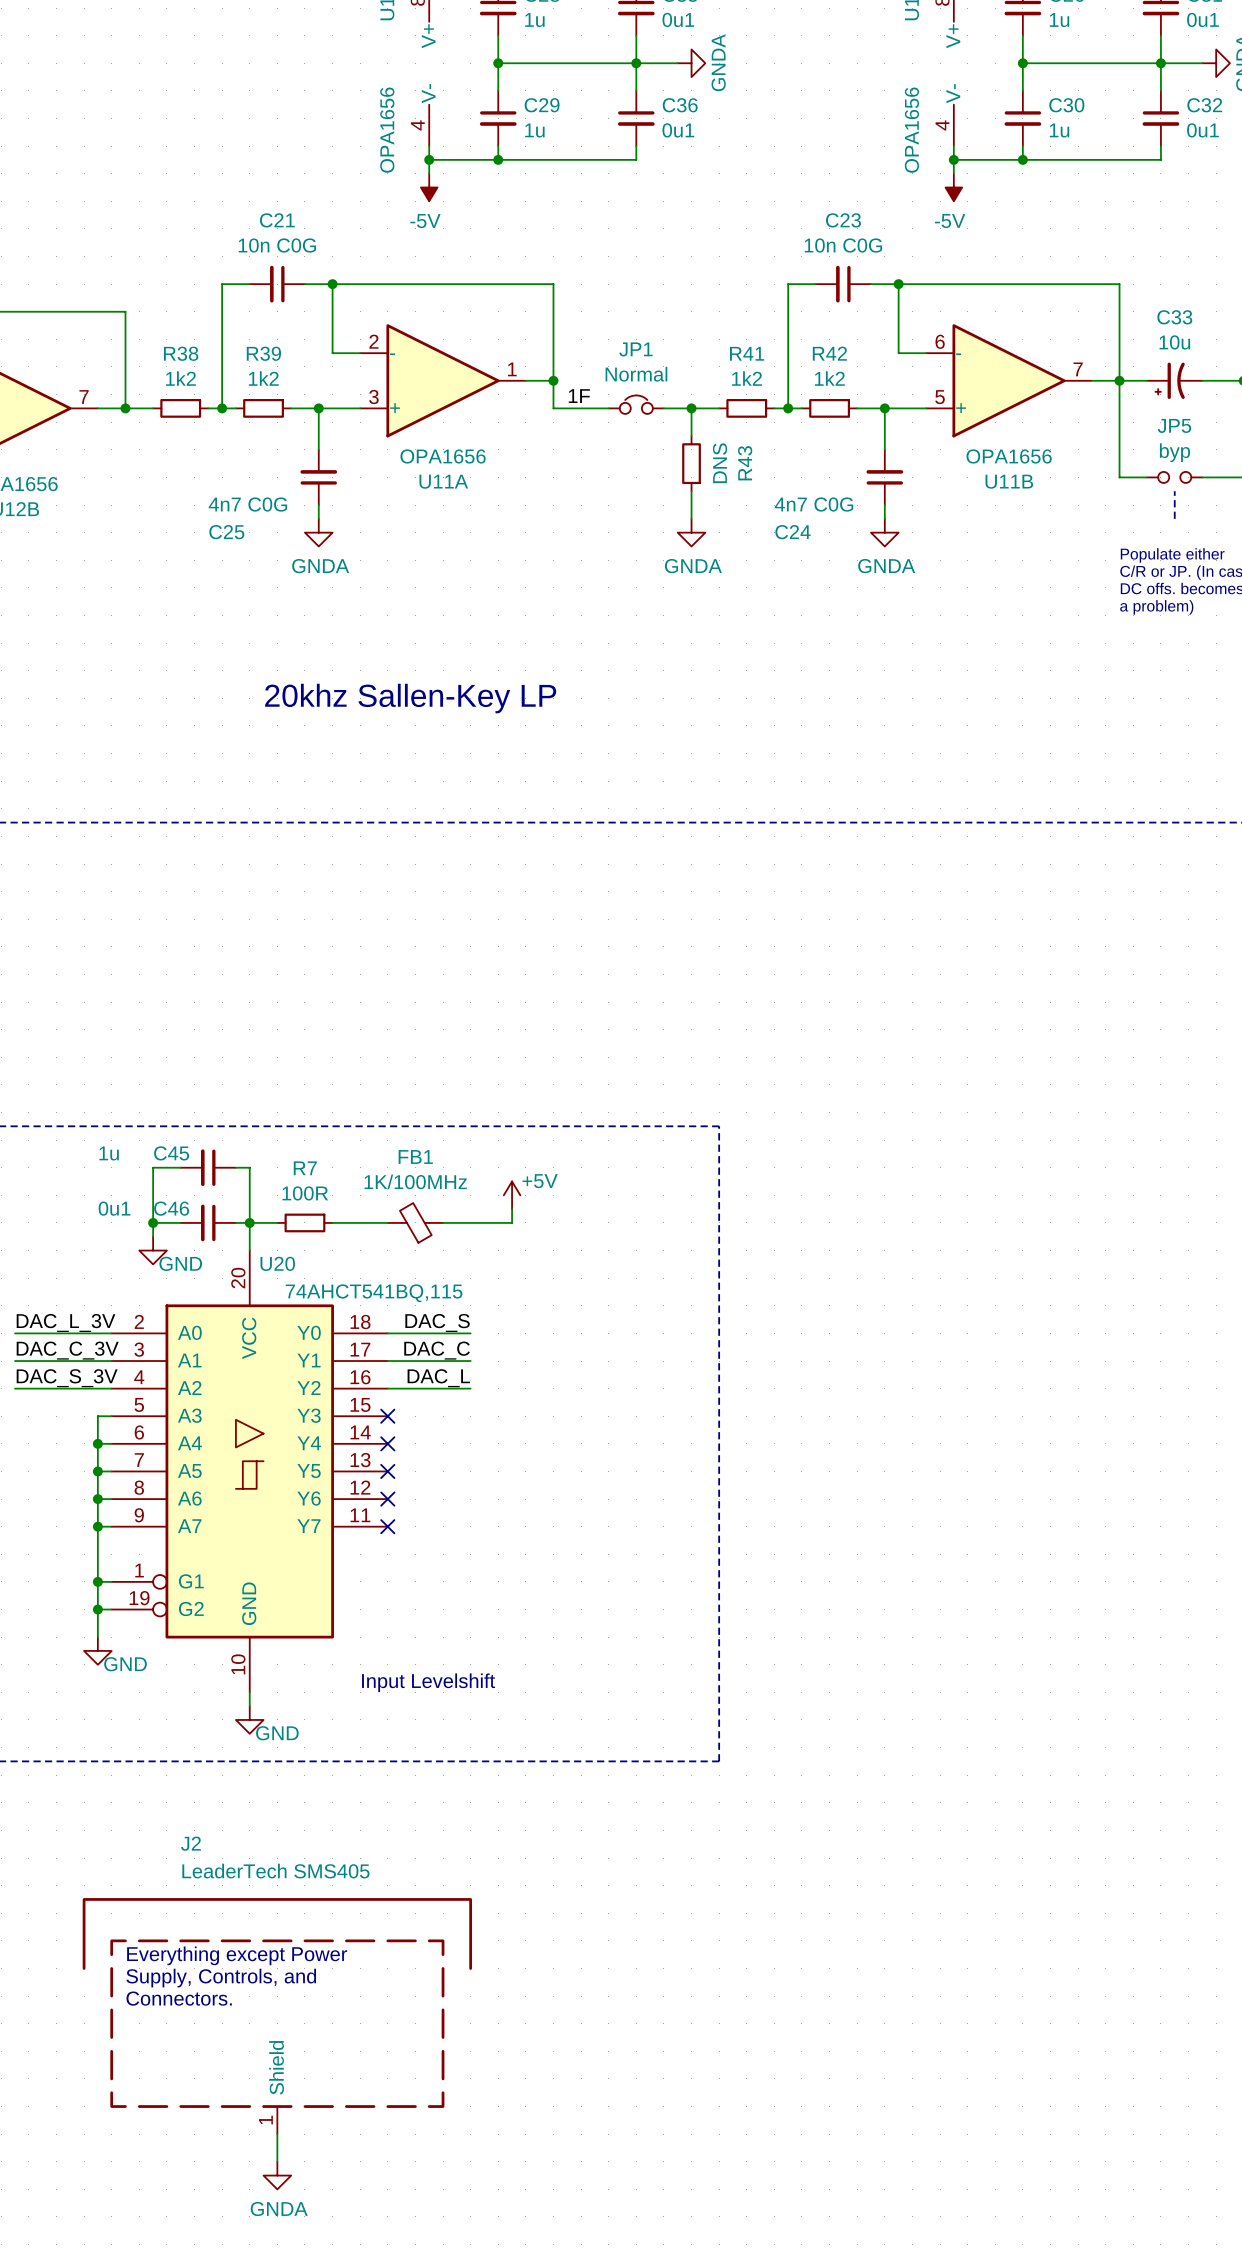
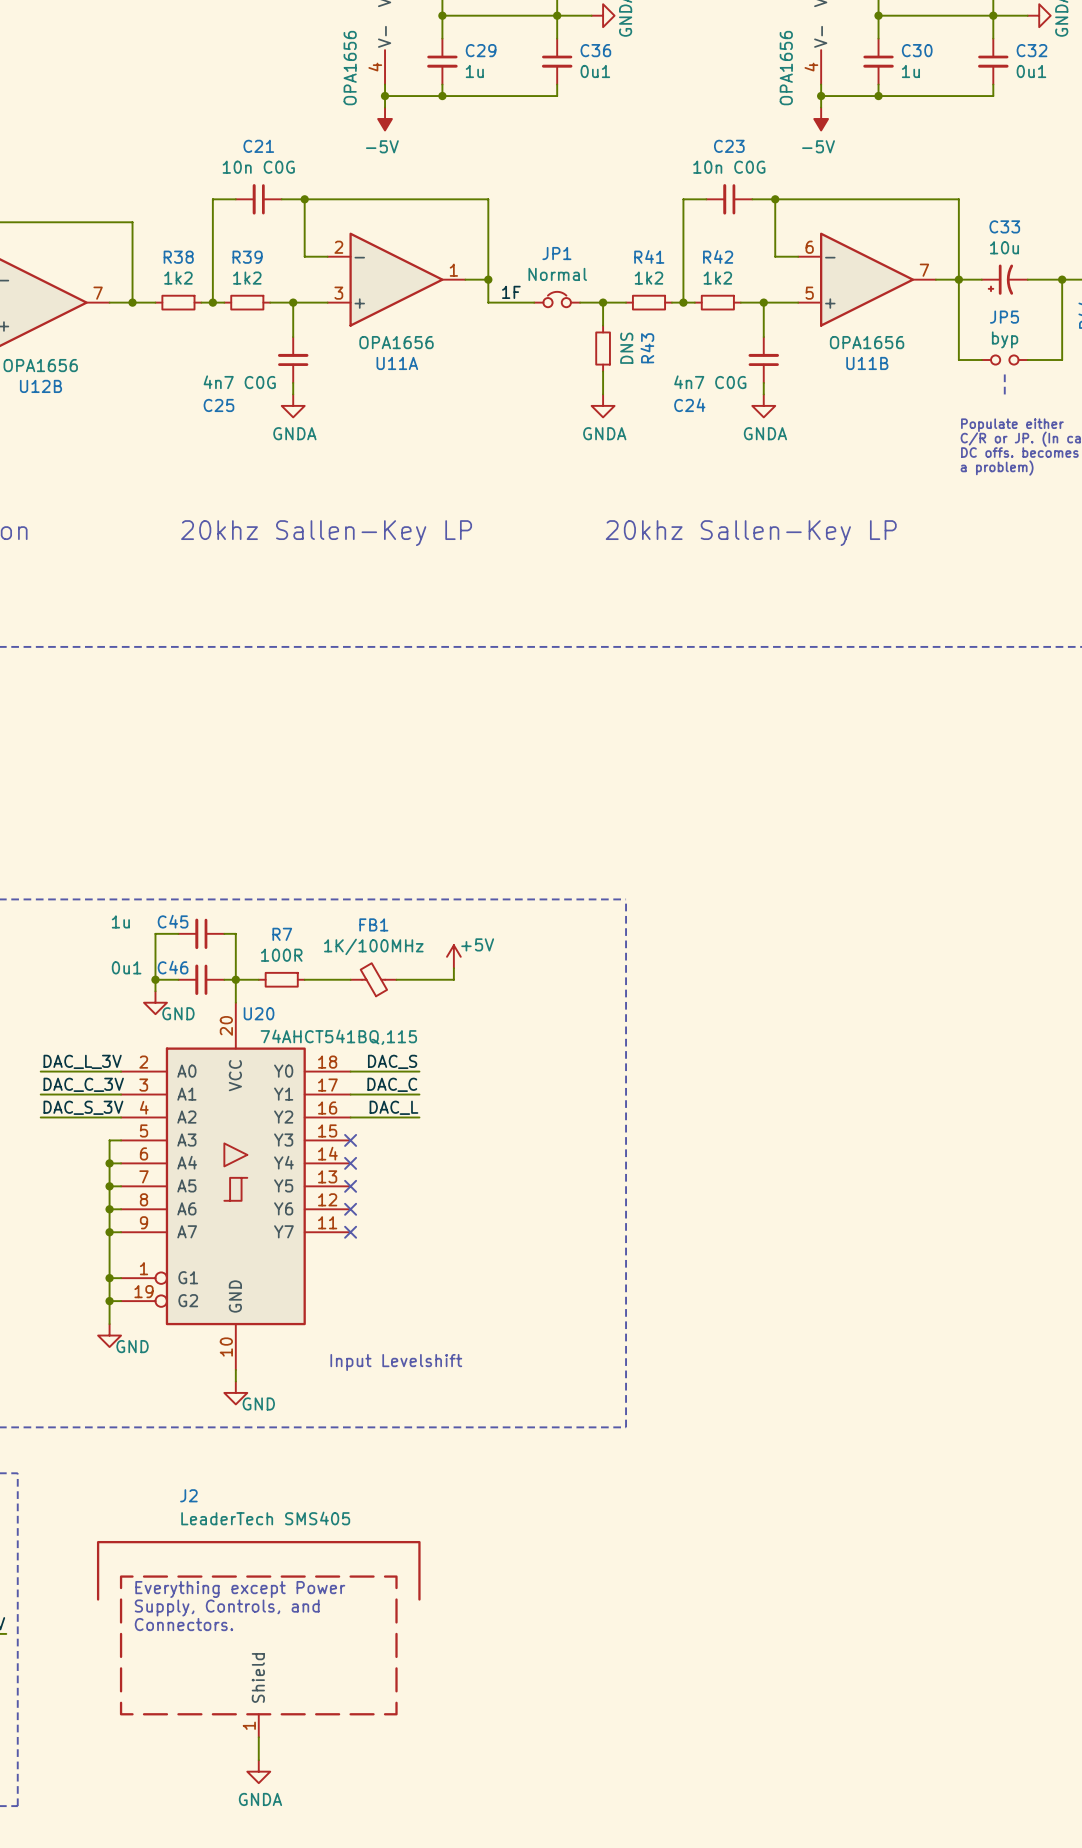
text: none -> 20khz Sallen-Key LP (751, 533)
text position: 20khz Sallen-Key LP (410, 698) -> 20khz Sallen-Key LP (326, 533)

